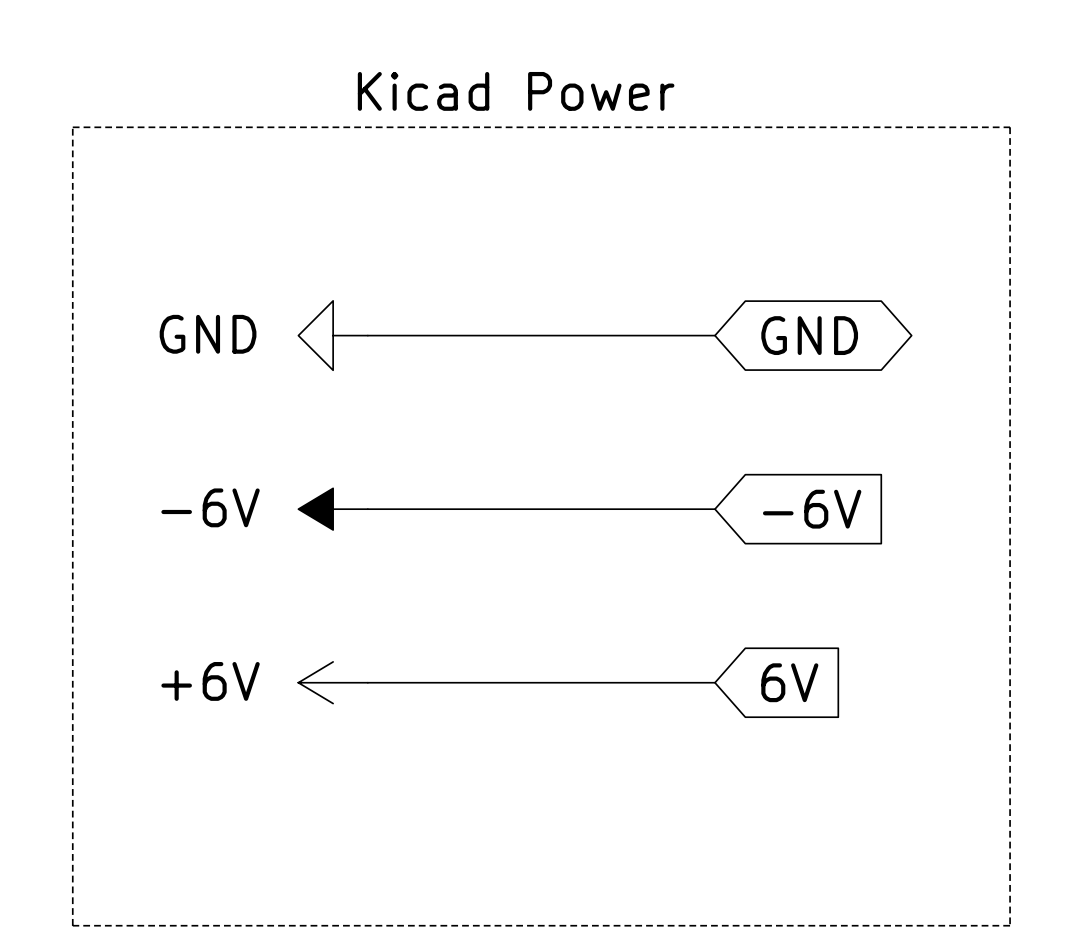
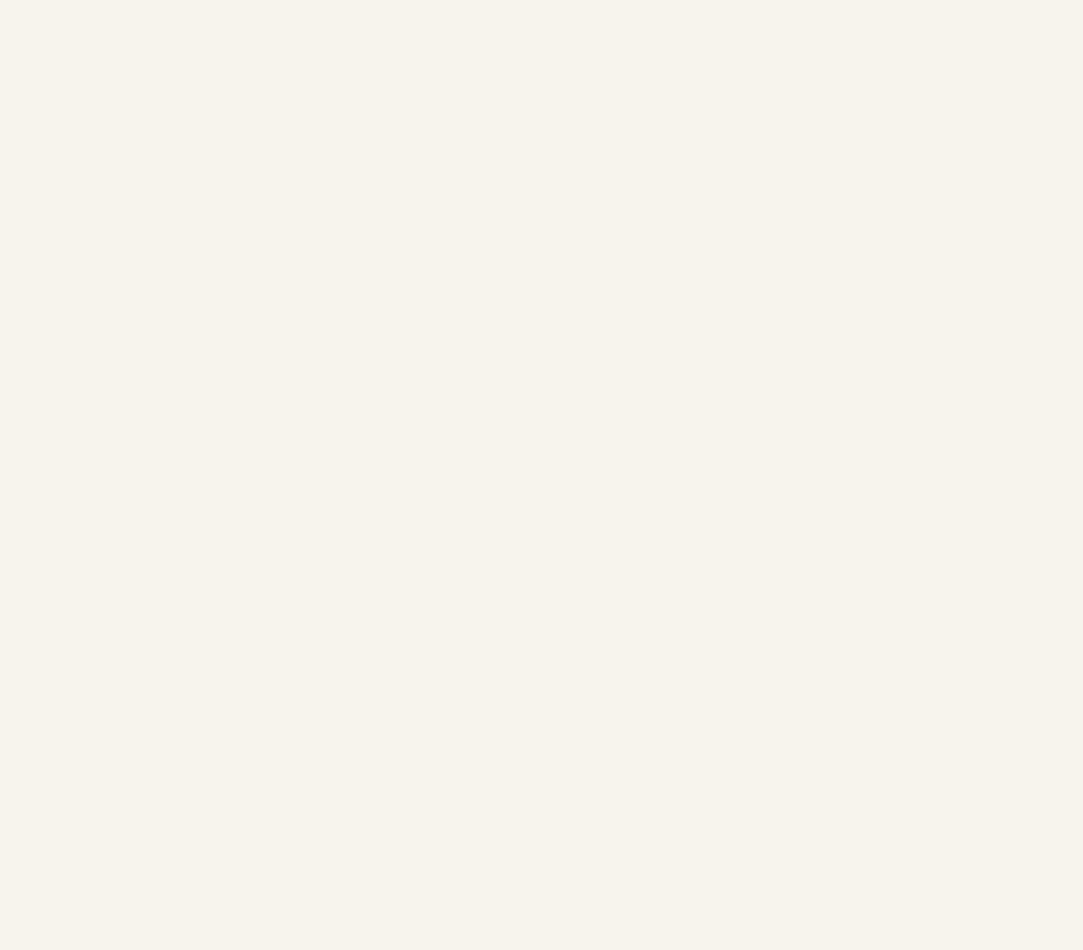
text: Kicad Power (516, 91) -> none
line: (72, 127) (1010, 127) (1010, 925) (72, 925) (72, 127) -> none
power symbol: GND (333, 335) -> none
wire: (367, 335) (714, 335) -> none
global label: GND (809, 335) -> none
power symbol: -6V (333, 509) -> none
wire: (367, 509) (714, 509) -> none
global label: -6V (812, 509) -> none
power symbol: +6V (333, 682) -> none
wire: (367, 682) (714, 682) -> none
global label: 6V (789, 682) -> none

